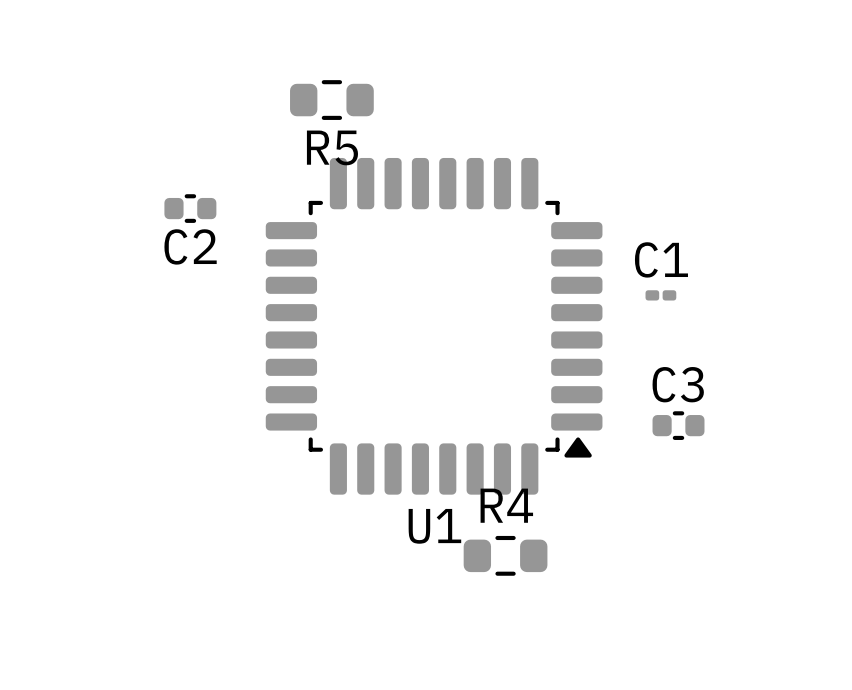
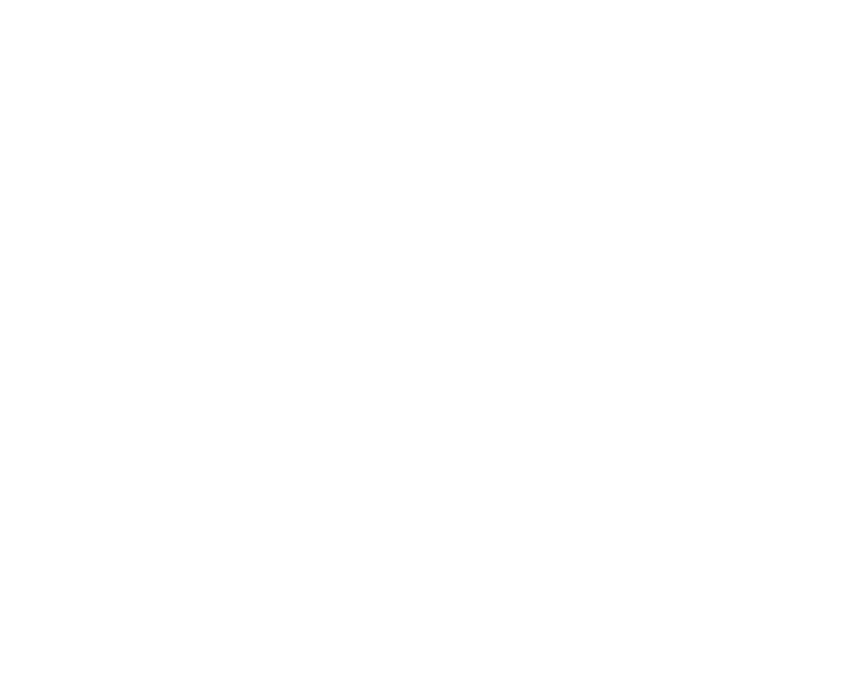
R5: (331, 100) -> none
C2: (190, 208) -> none
C1: (660, 295) -> none
U1: (434, 326) -> none
C3: (678, 425) -> none
R4: (505, 555) -> none

